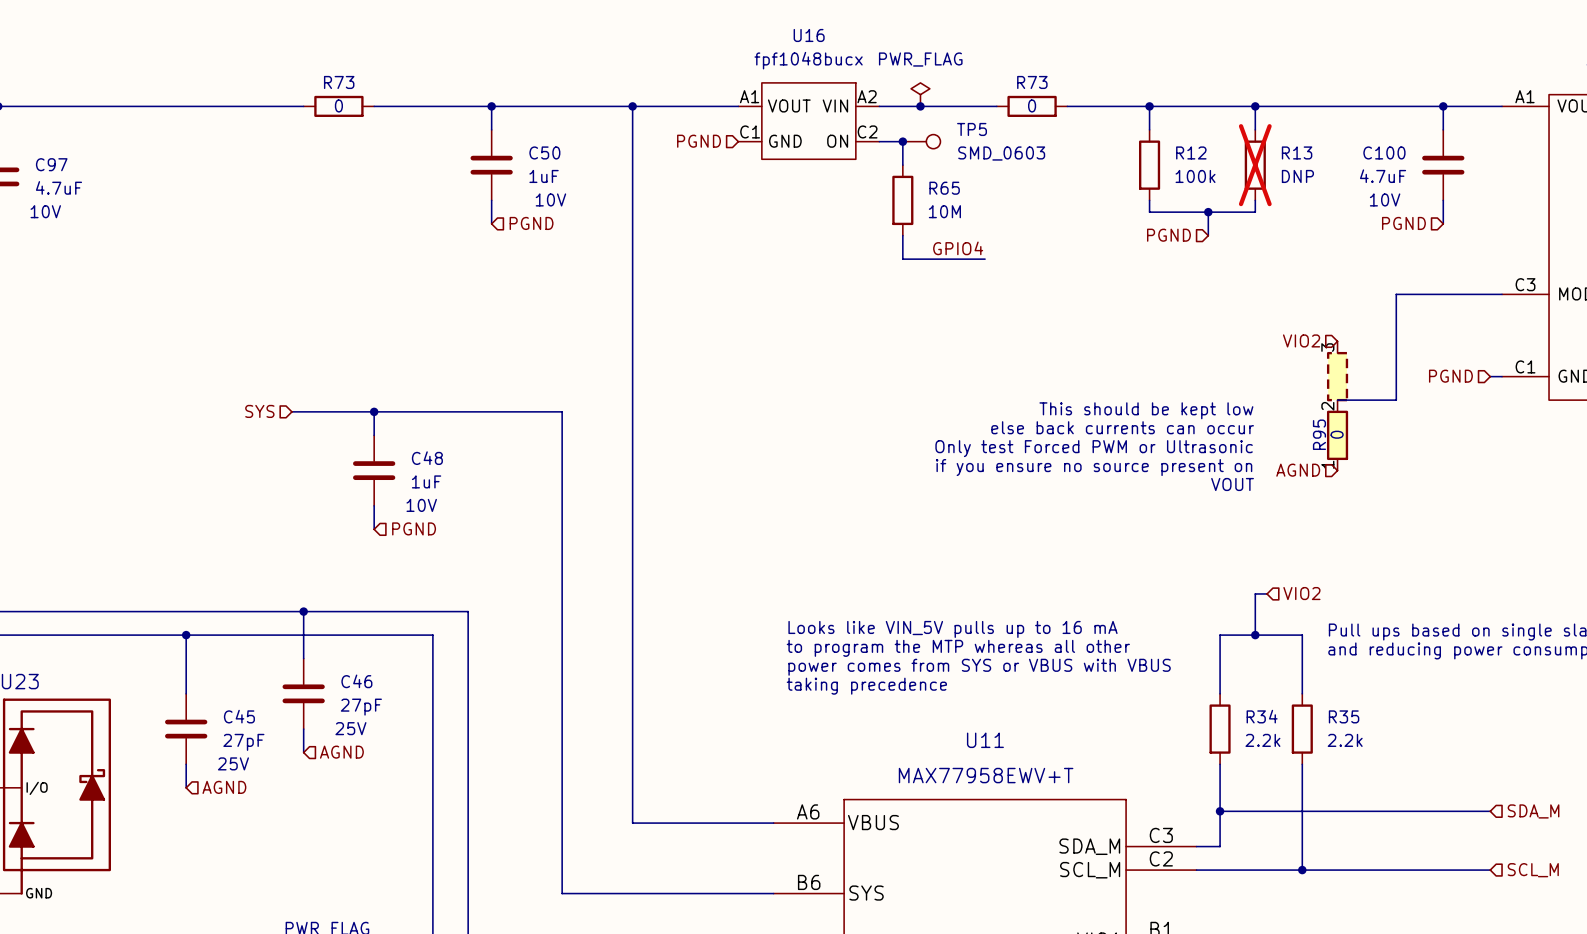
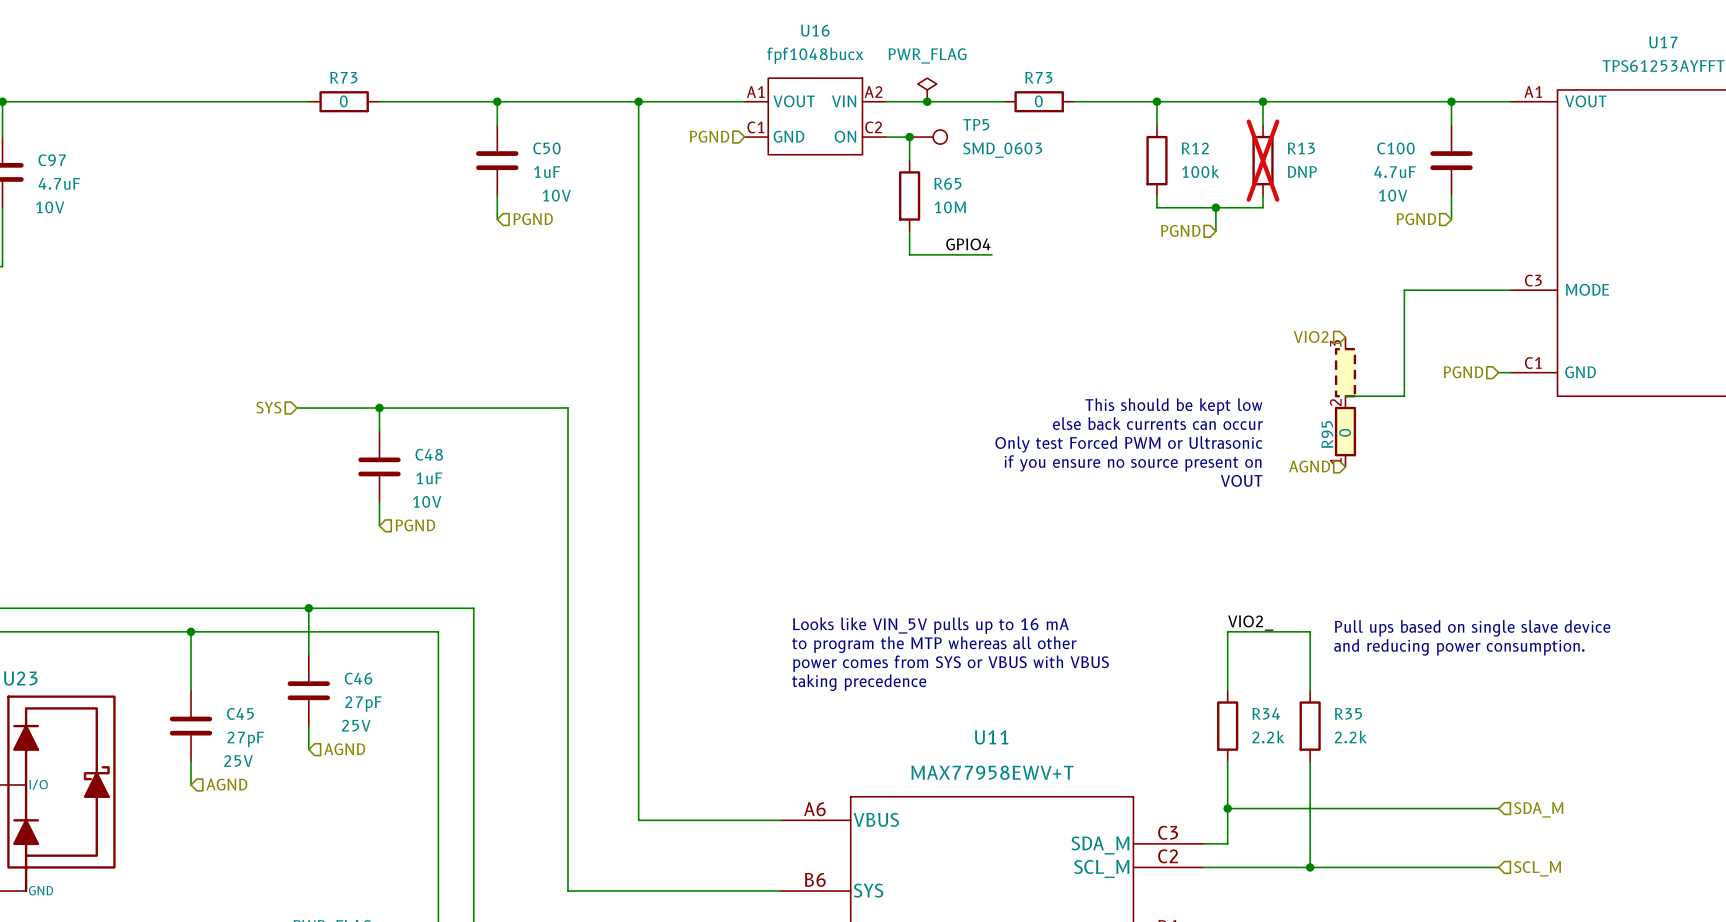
wire: (1267, 593) (1255, 593) (1255, 635) -> none
hierarchical label: VIO2 (1301, 593) -> none
label: none -> VIO2_ (1250, 623)
junction: (1255, 635) -> none

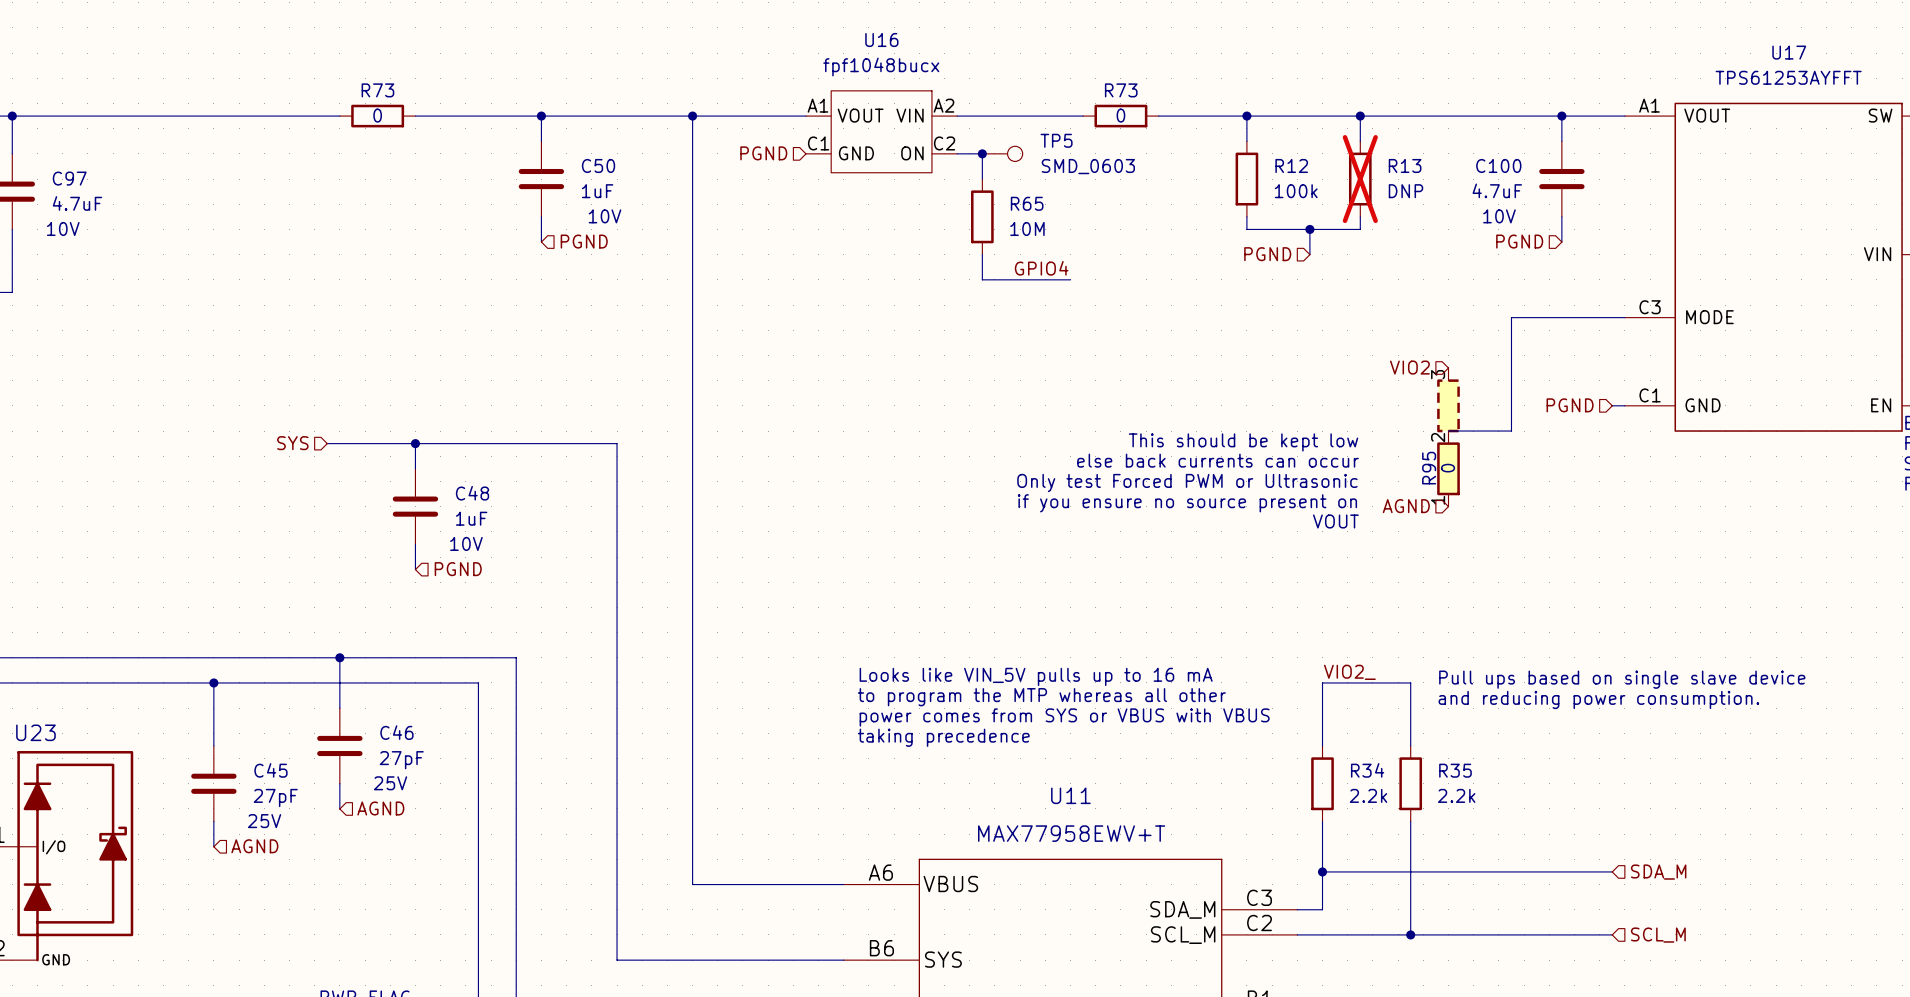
power symbol: PWR_FLAG (927, 89) -> none
junction: (927, 101) -> none

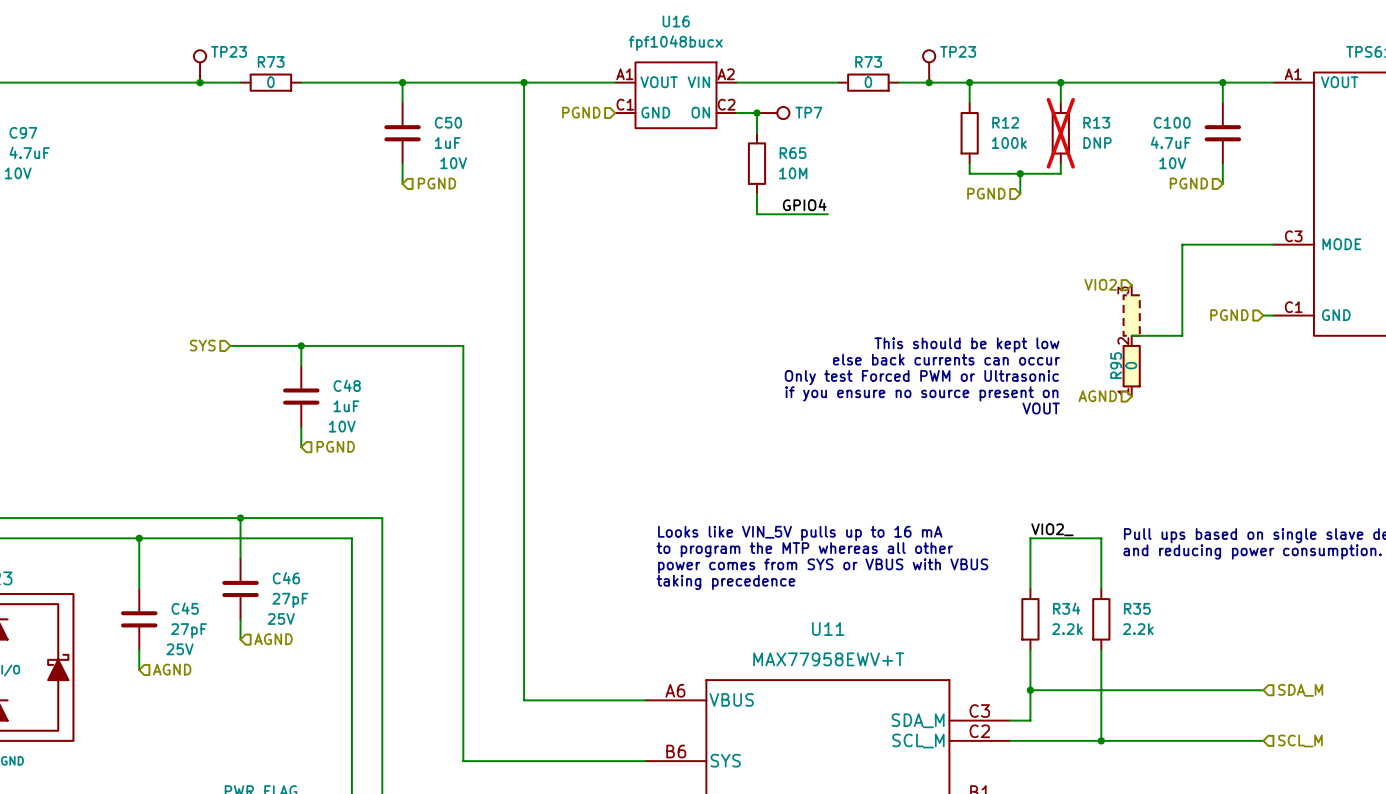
TP23: none -> (200, 66)
TP23: none -> (929, 66)
junction: none -> (200, 82)
junction: none -> (929, 82)
TP5 name: TP5 (1056, 140) -> TP7 (808, 112)
TP5 value: SMD_0603 (1088, 166) -> none

